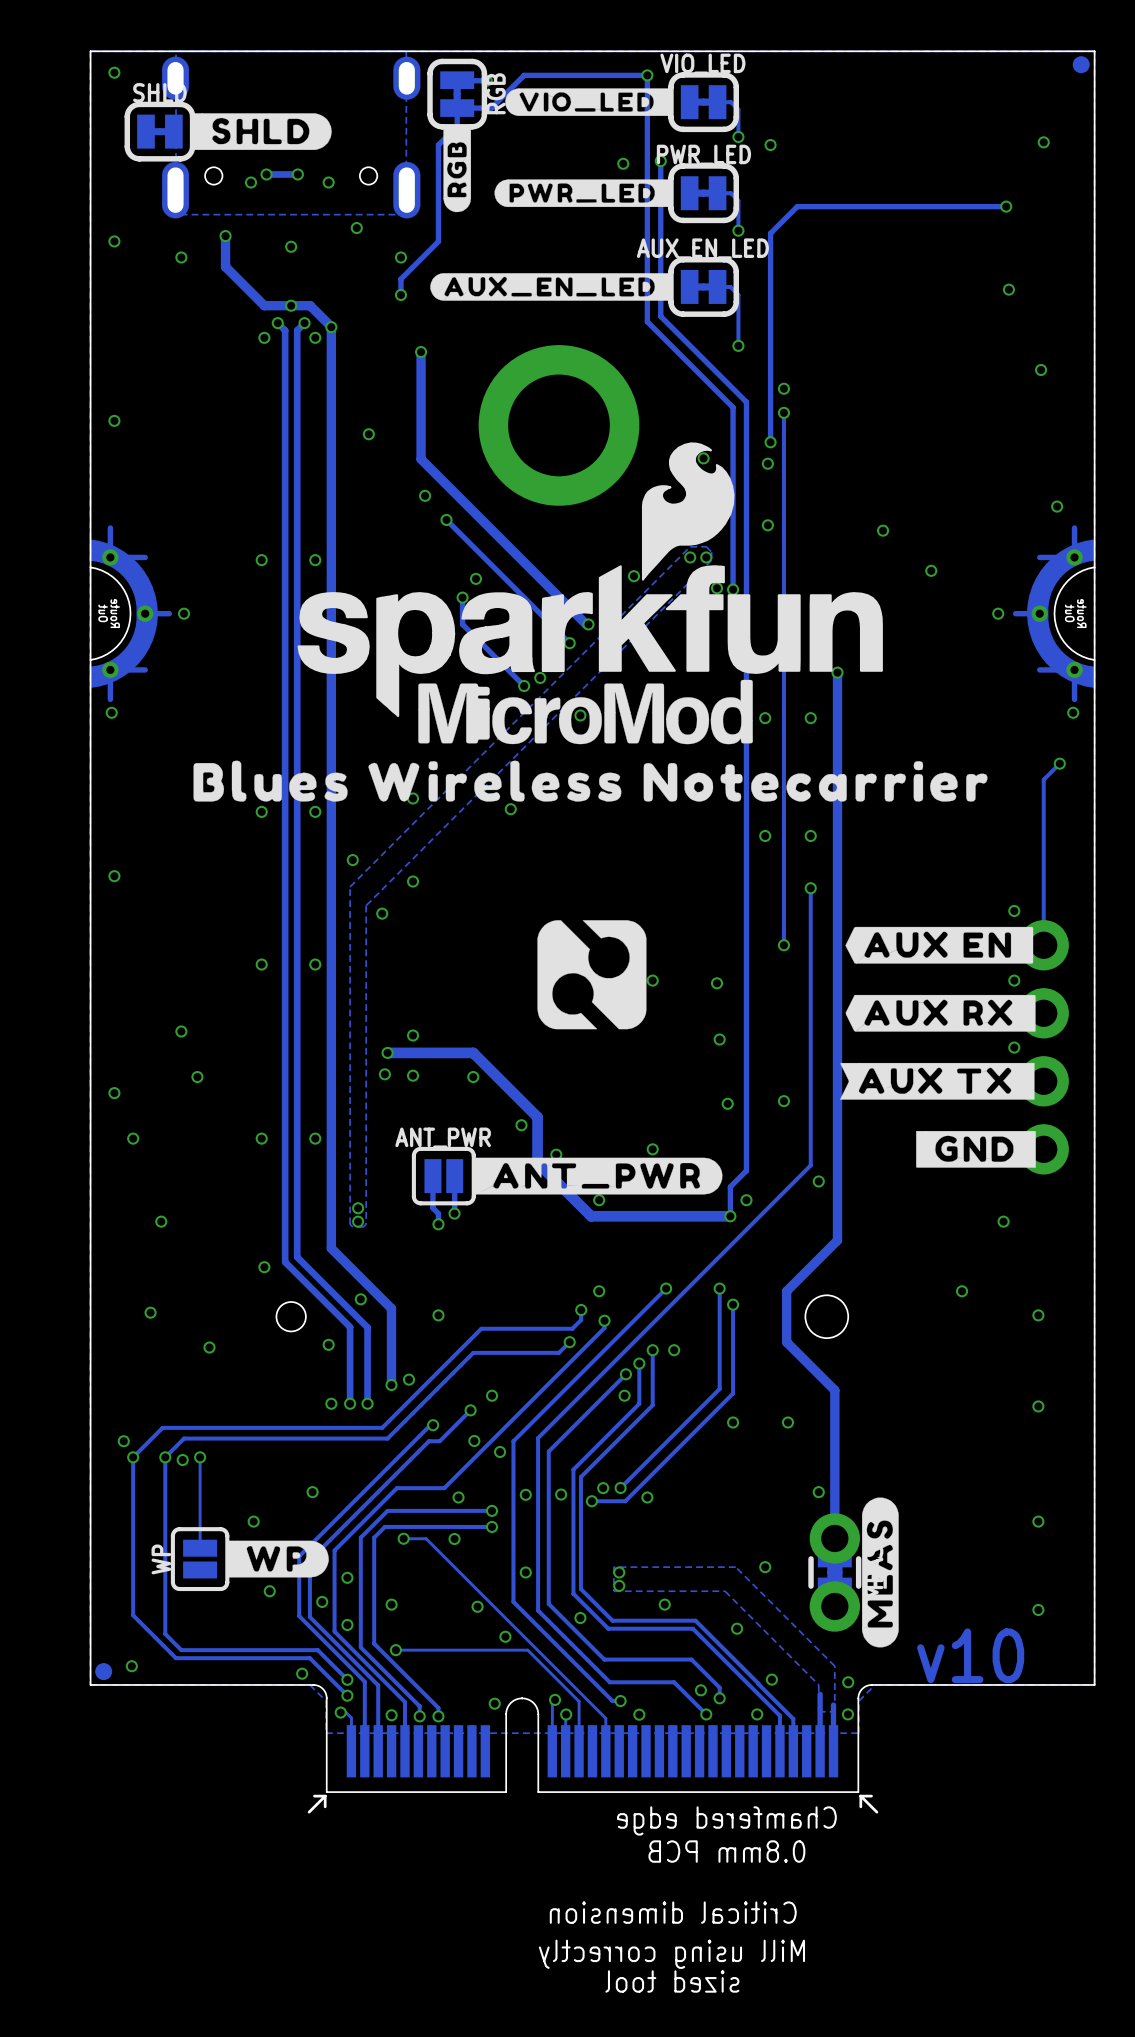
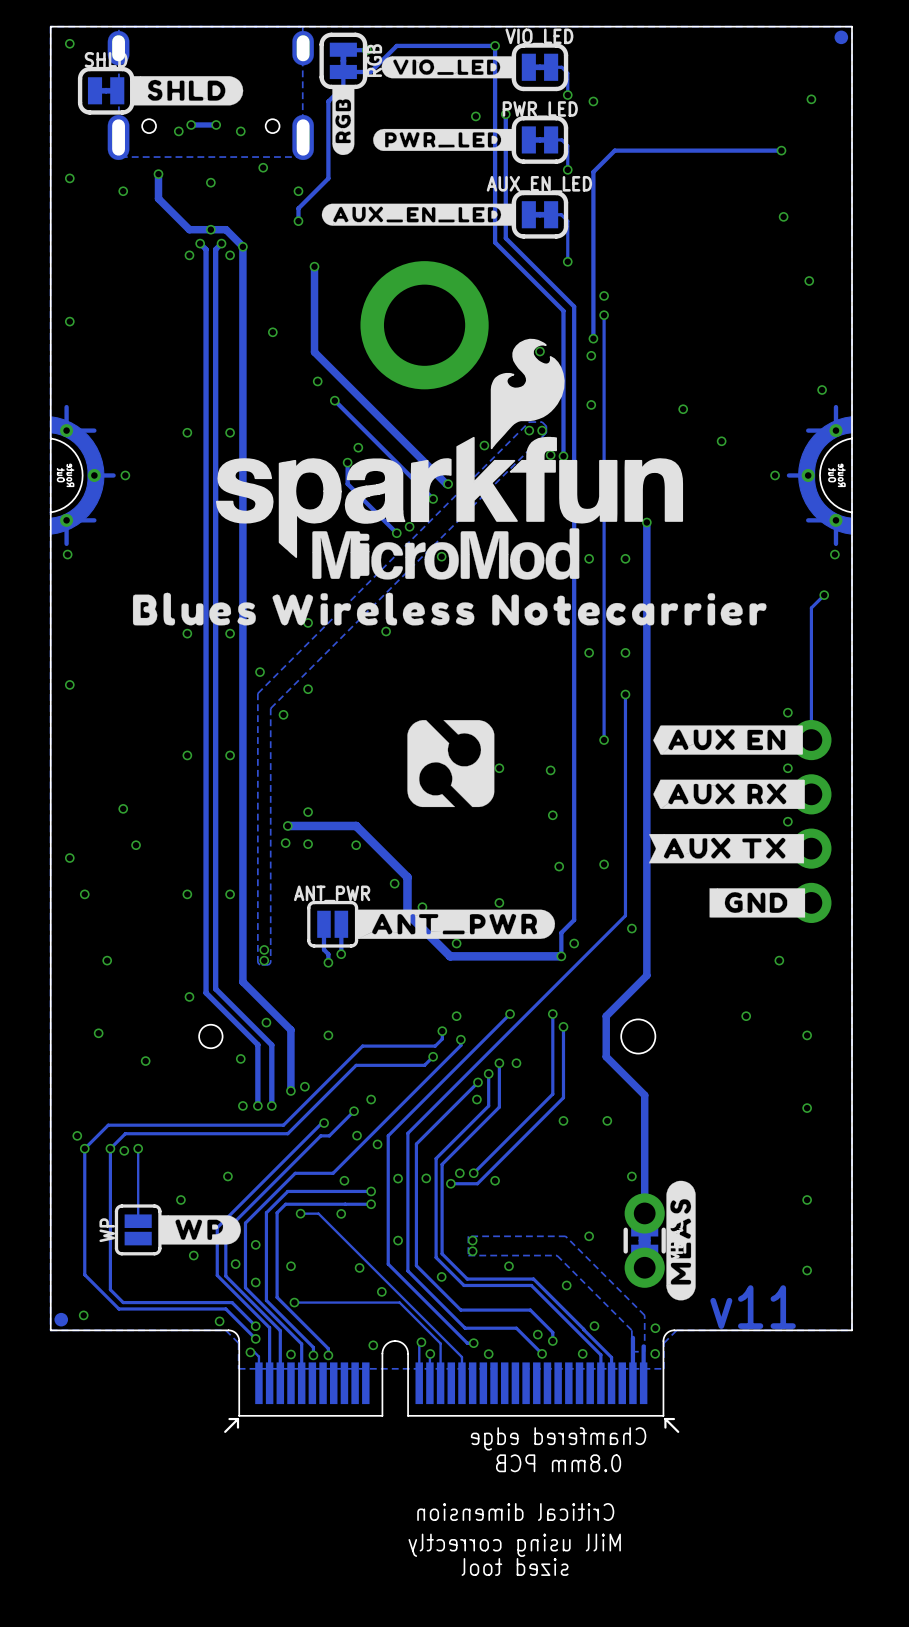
text: v10 (970, 1655) -> v11 (753, 1307)

